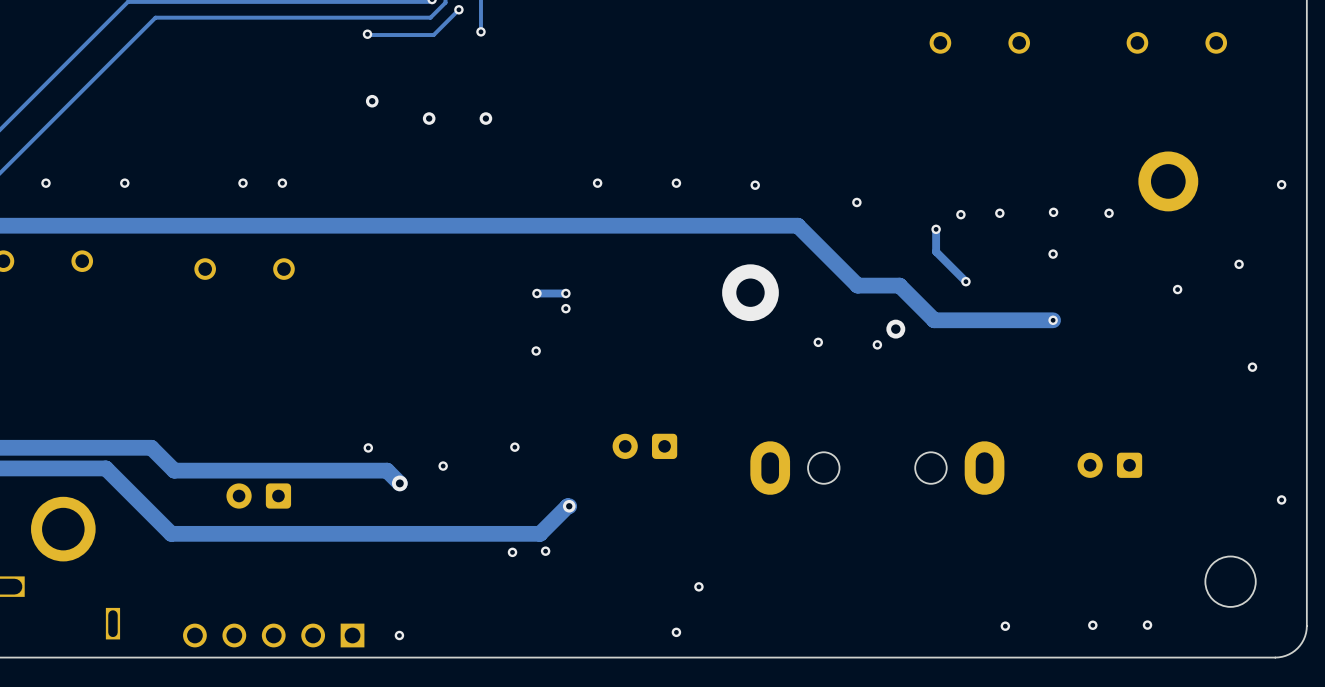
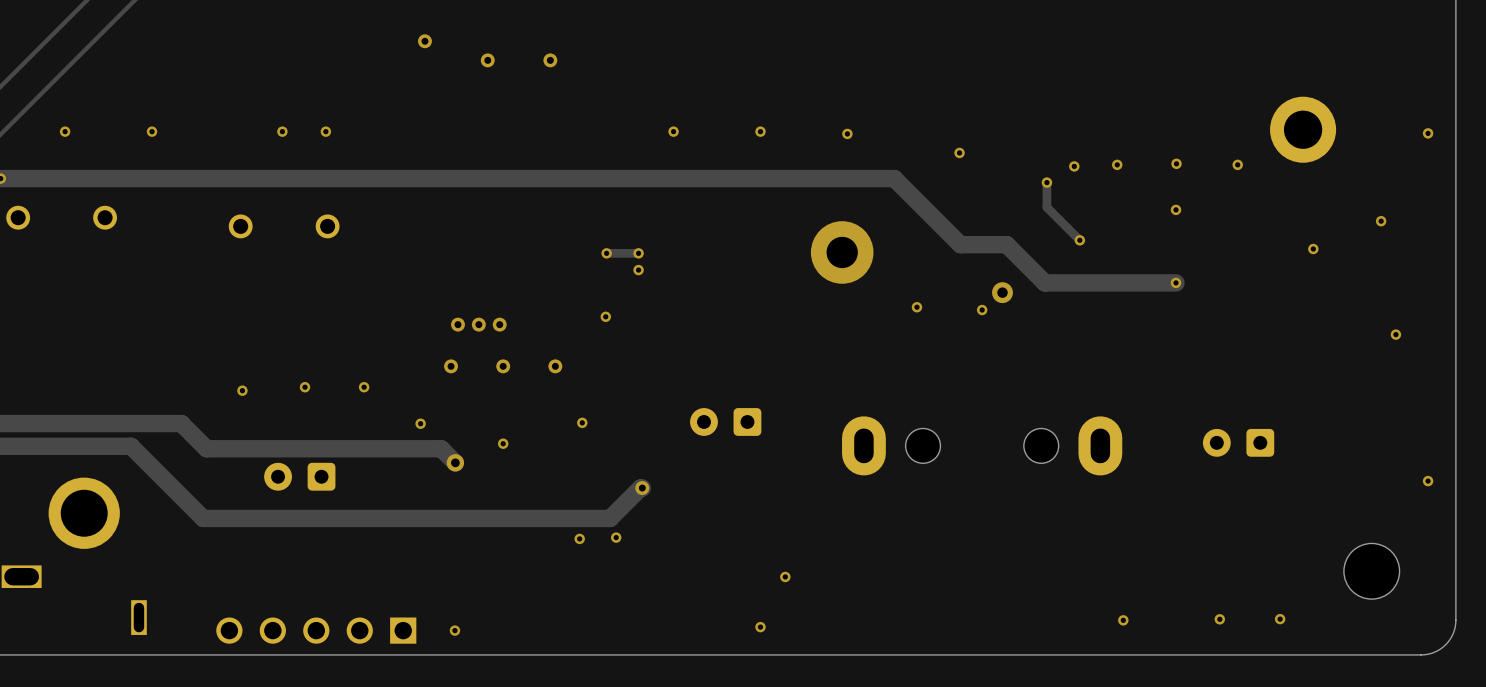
via: none -> (457, 324)
via: none -> (478, 324)
via: none -> (499, 324)
via: none -> (451, 366)
via: none -> (503, 366)
via: none -> (555, 366)
via: none -> (305, 387)
via: none -> (364, 387)
via: none -> (242, 390)

